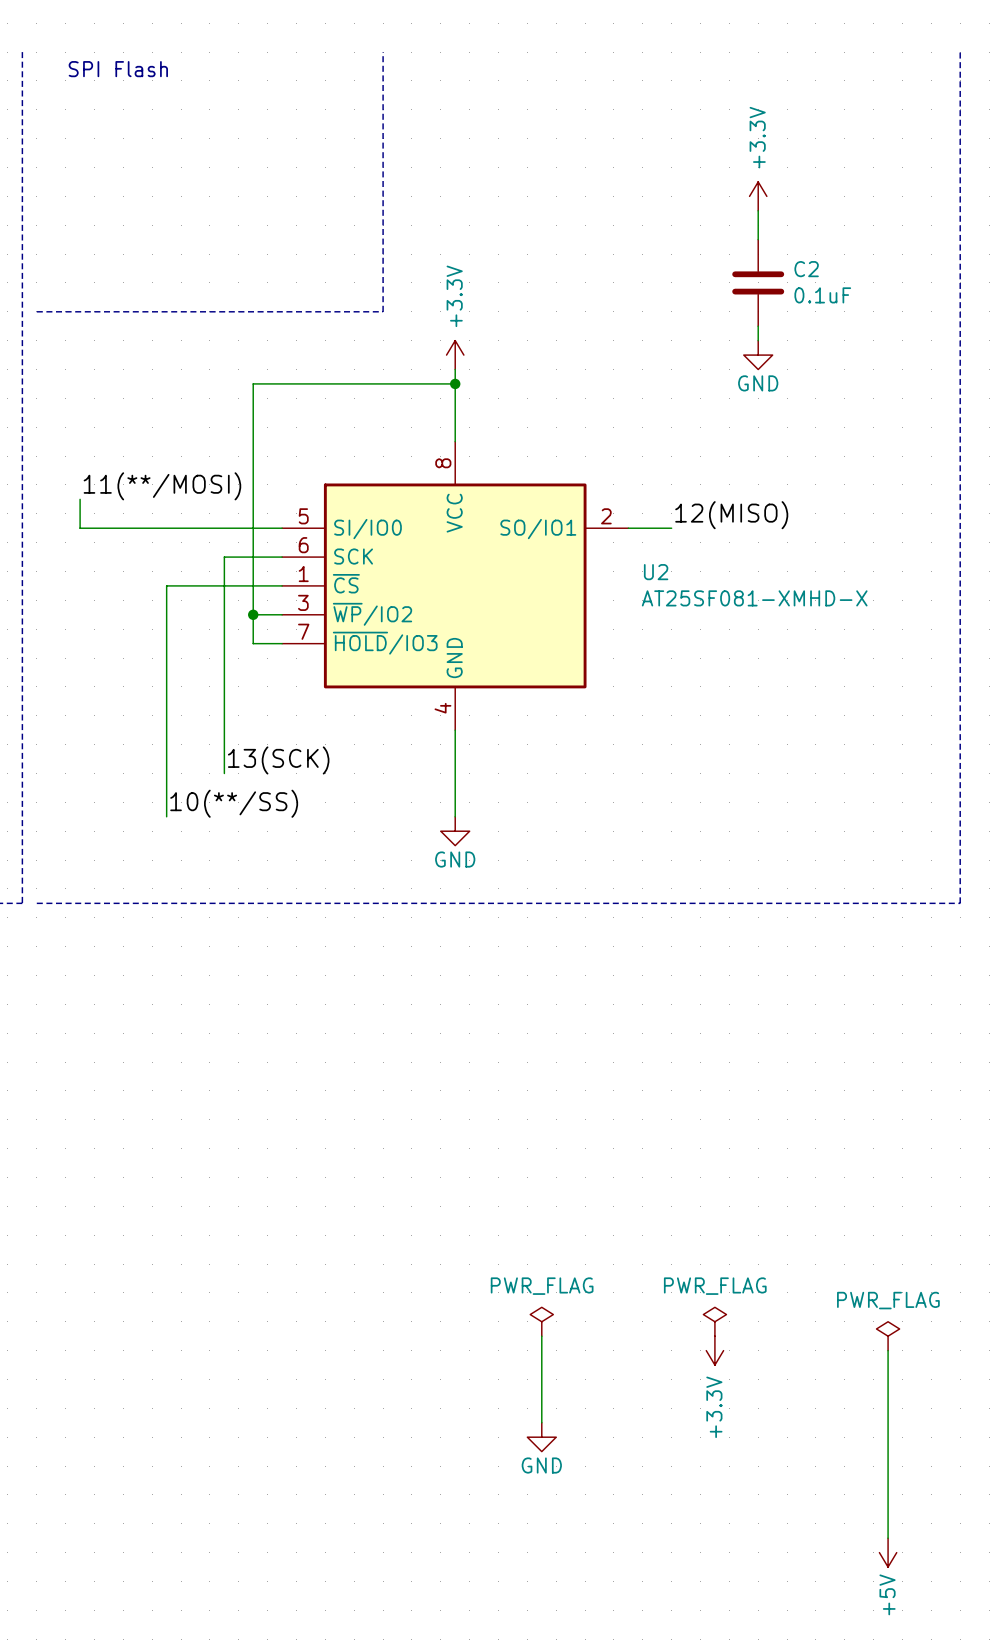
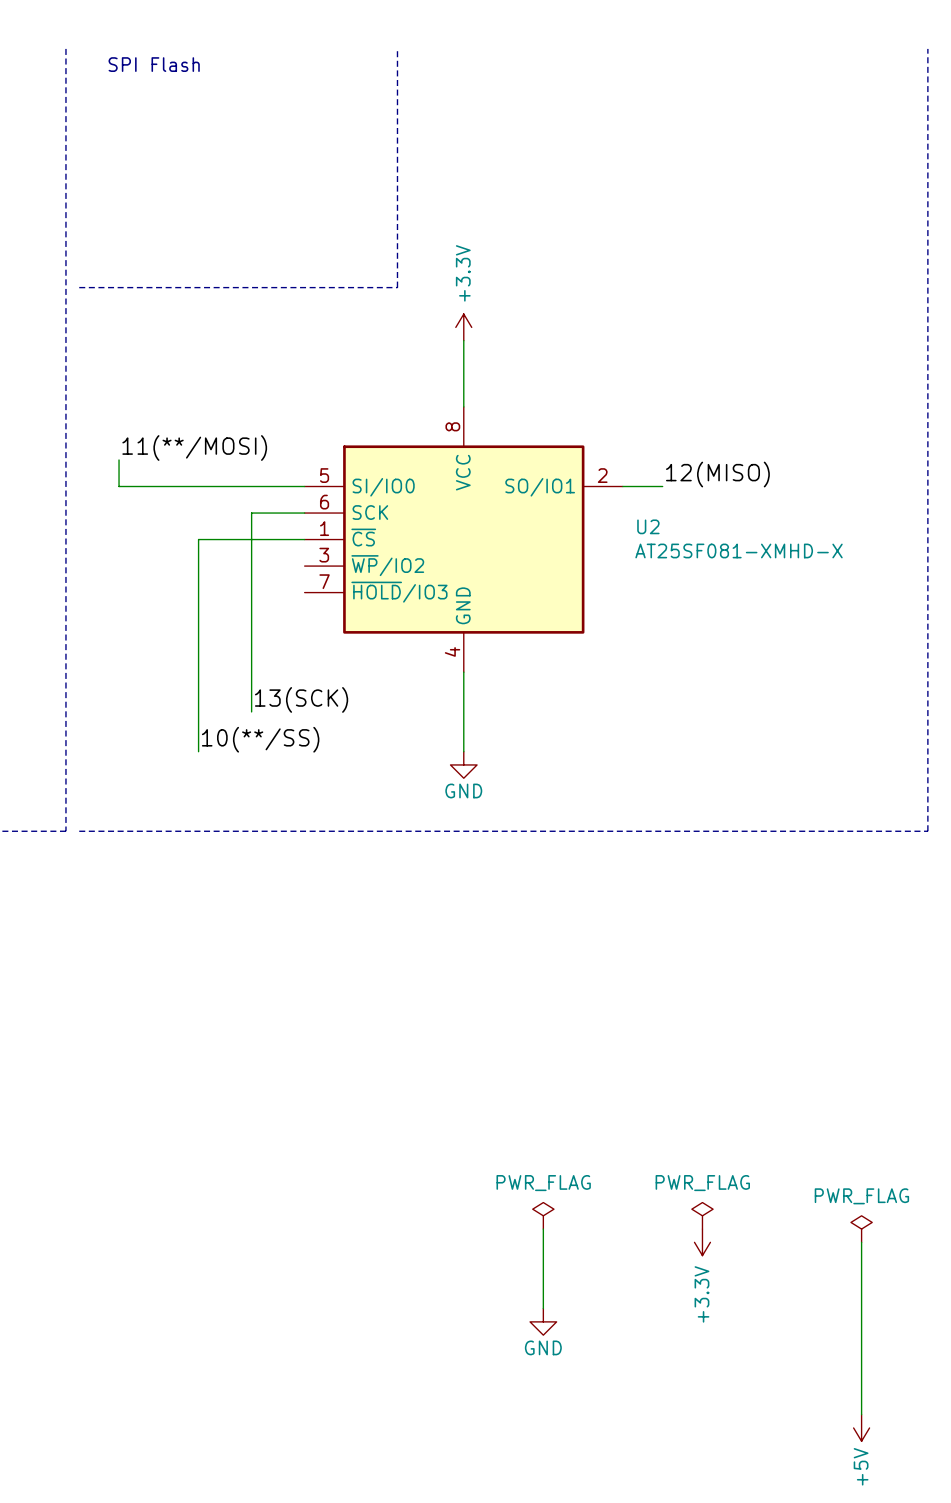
power symbol: +3.3V (758, 196) -> none
wire: (758, 210) (758, 239) -> none
C2: 0.1uF (758, 282) -> none
wire: (758, 326) (758, 340) -> none
power symbol: GND (758, 355) -> none
wire: (455, 383) (253, 383) (253, 643) (282, 643) -> none
junction: (455, 383) -> none
wire: (253, 614) (282, 614) -> none
junction: (253, 614) -> none

